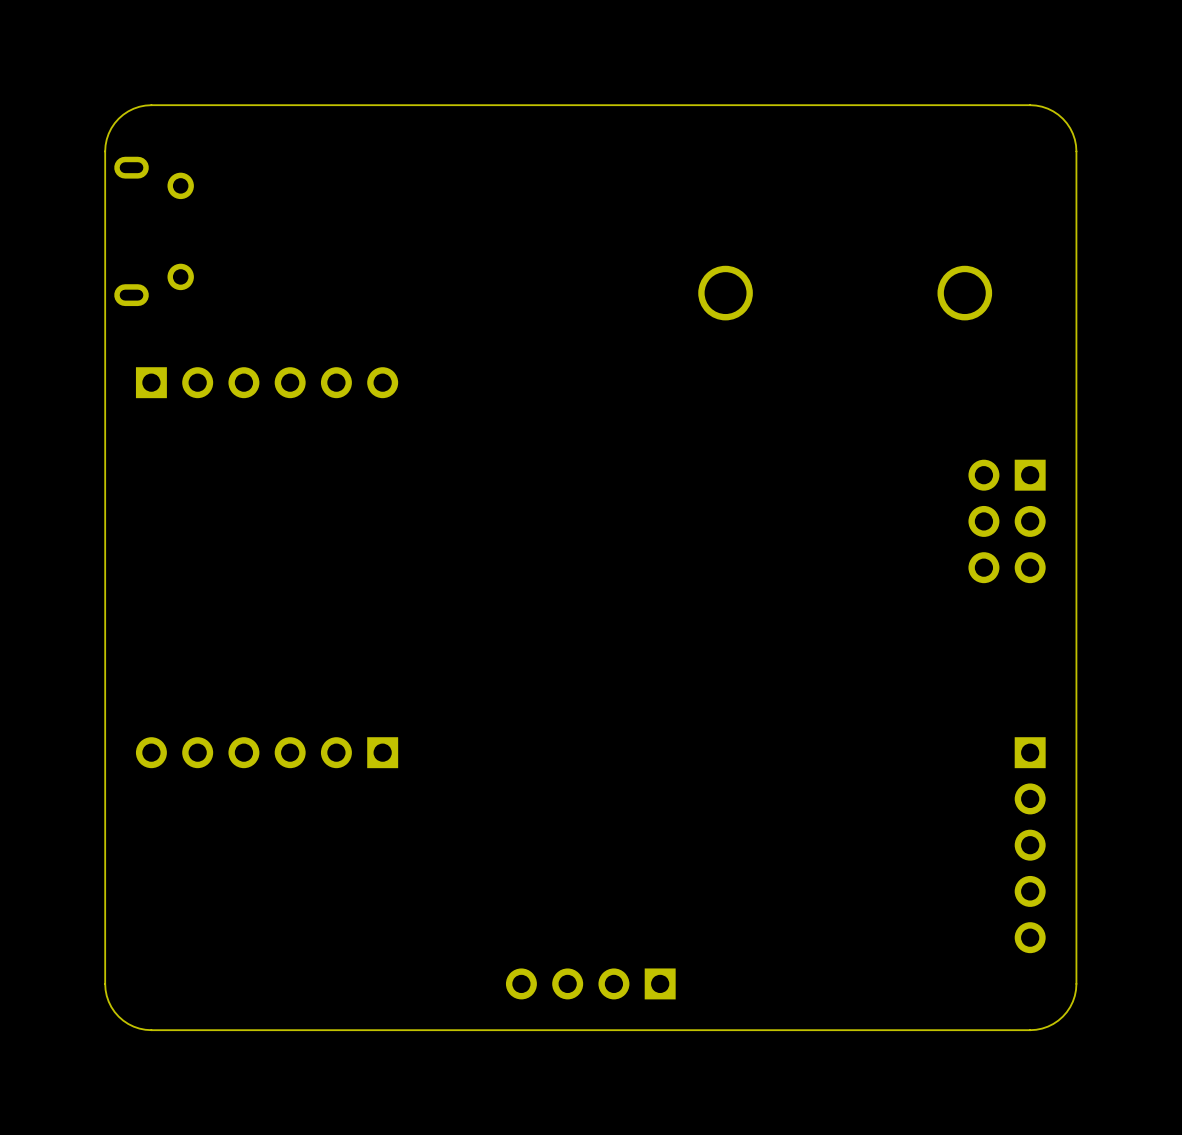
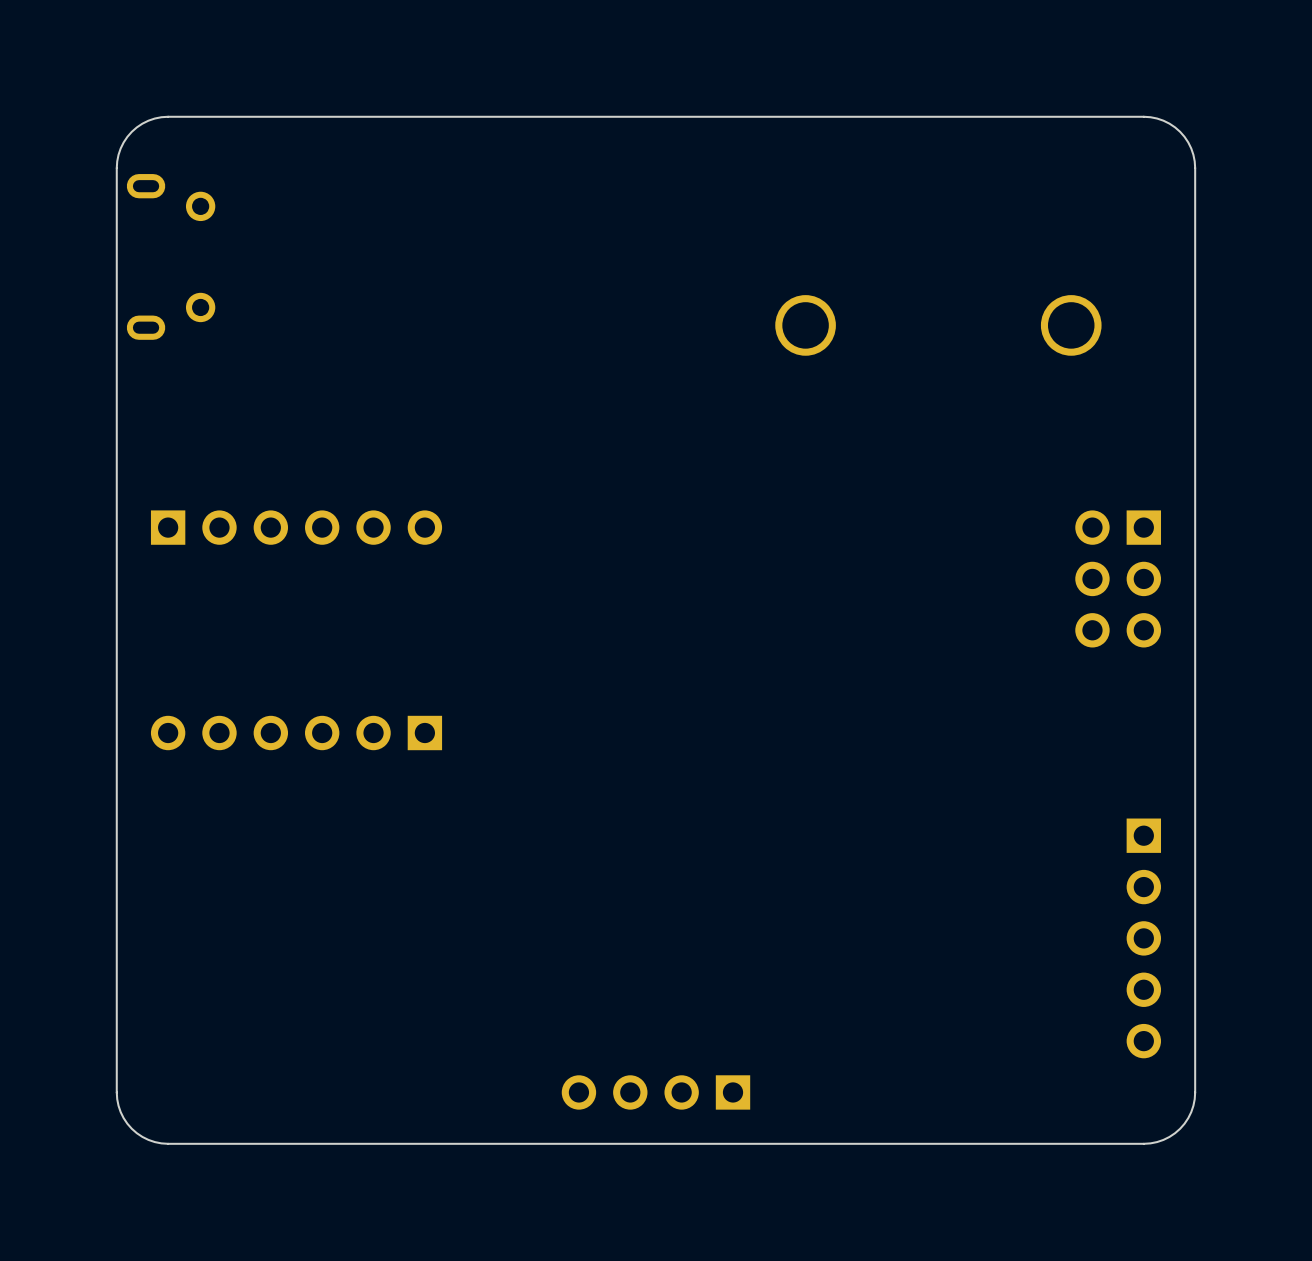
part position: (267, 382) -> (296, 527)
part position: (267, 752) -> (296, 733)

